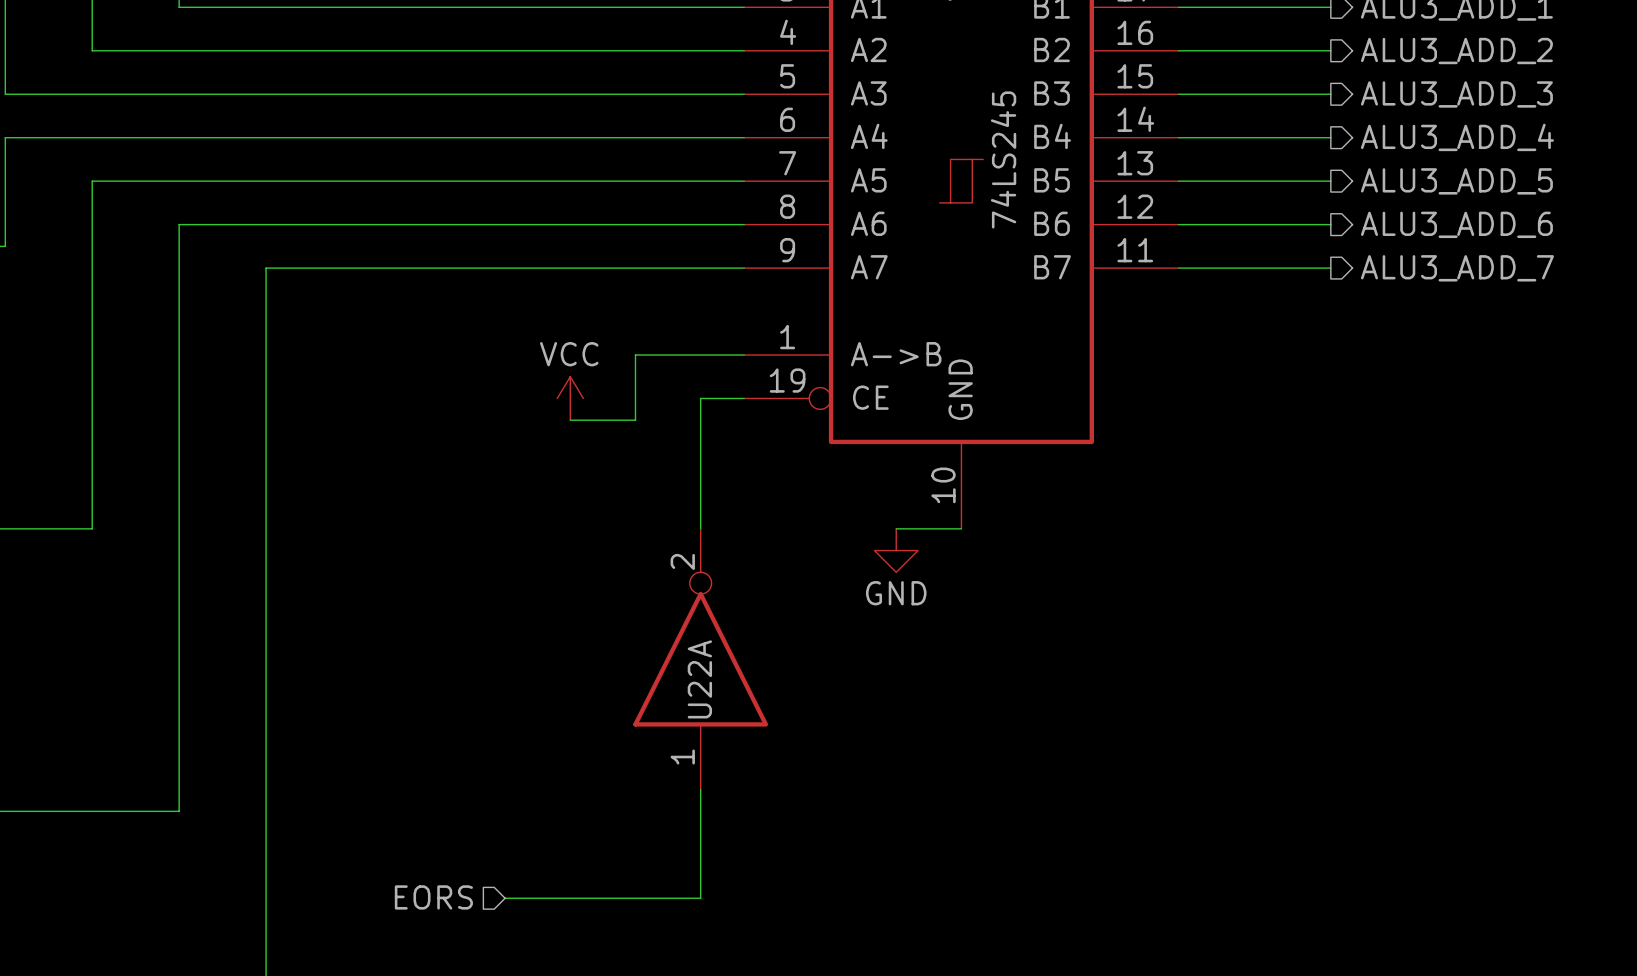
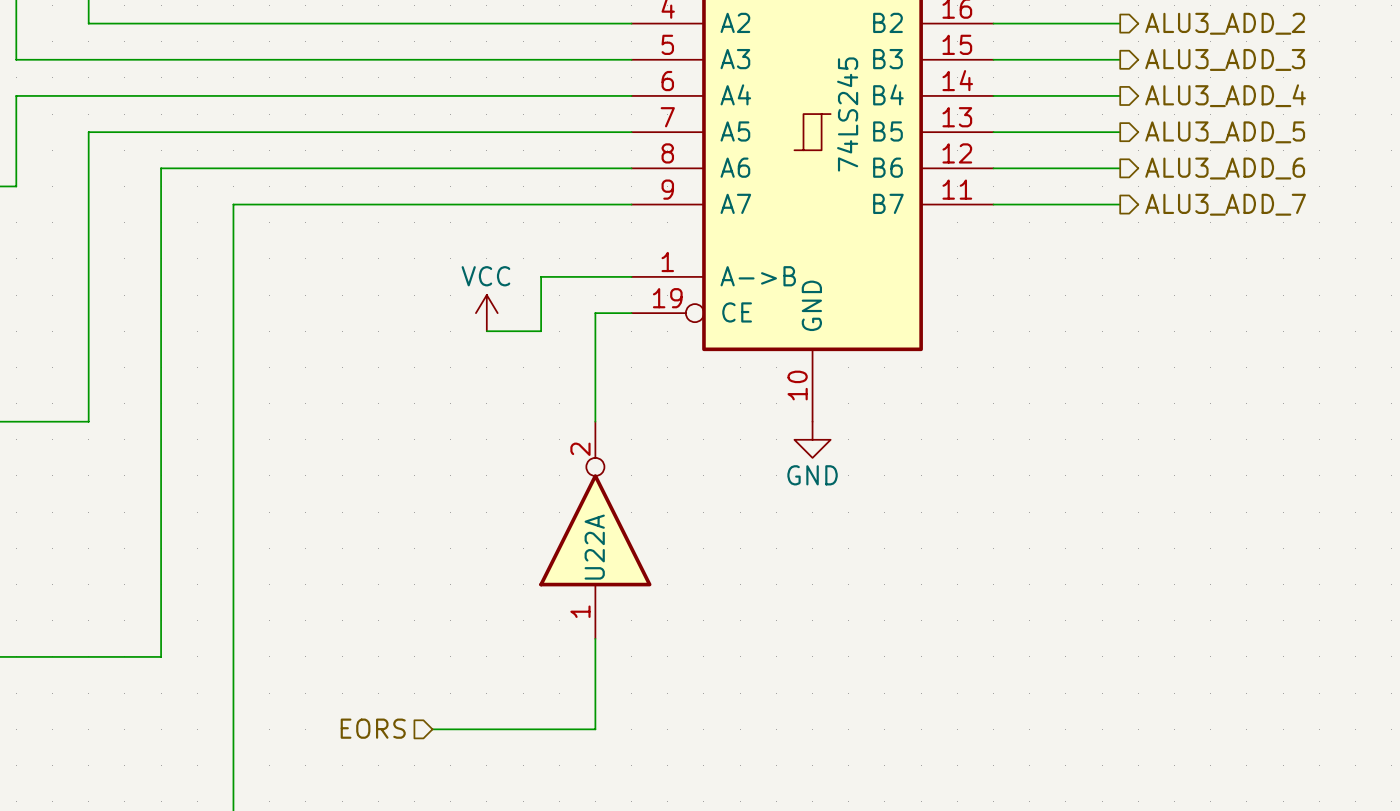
wire: (896, 528) (961, 528) -> none
power symbol position: GND (896, 550) -> GND (812, 439)

